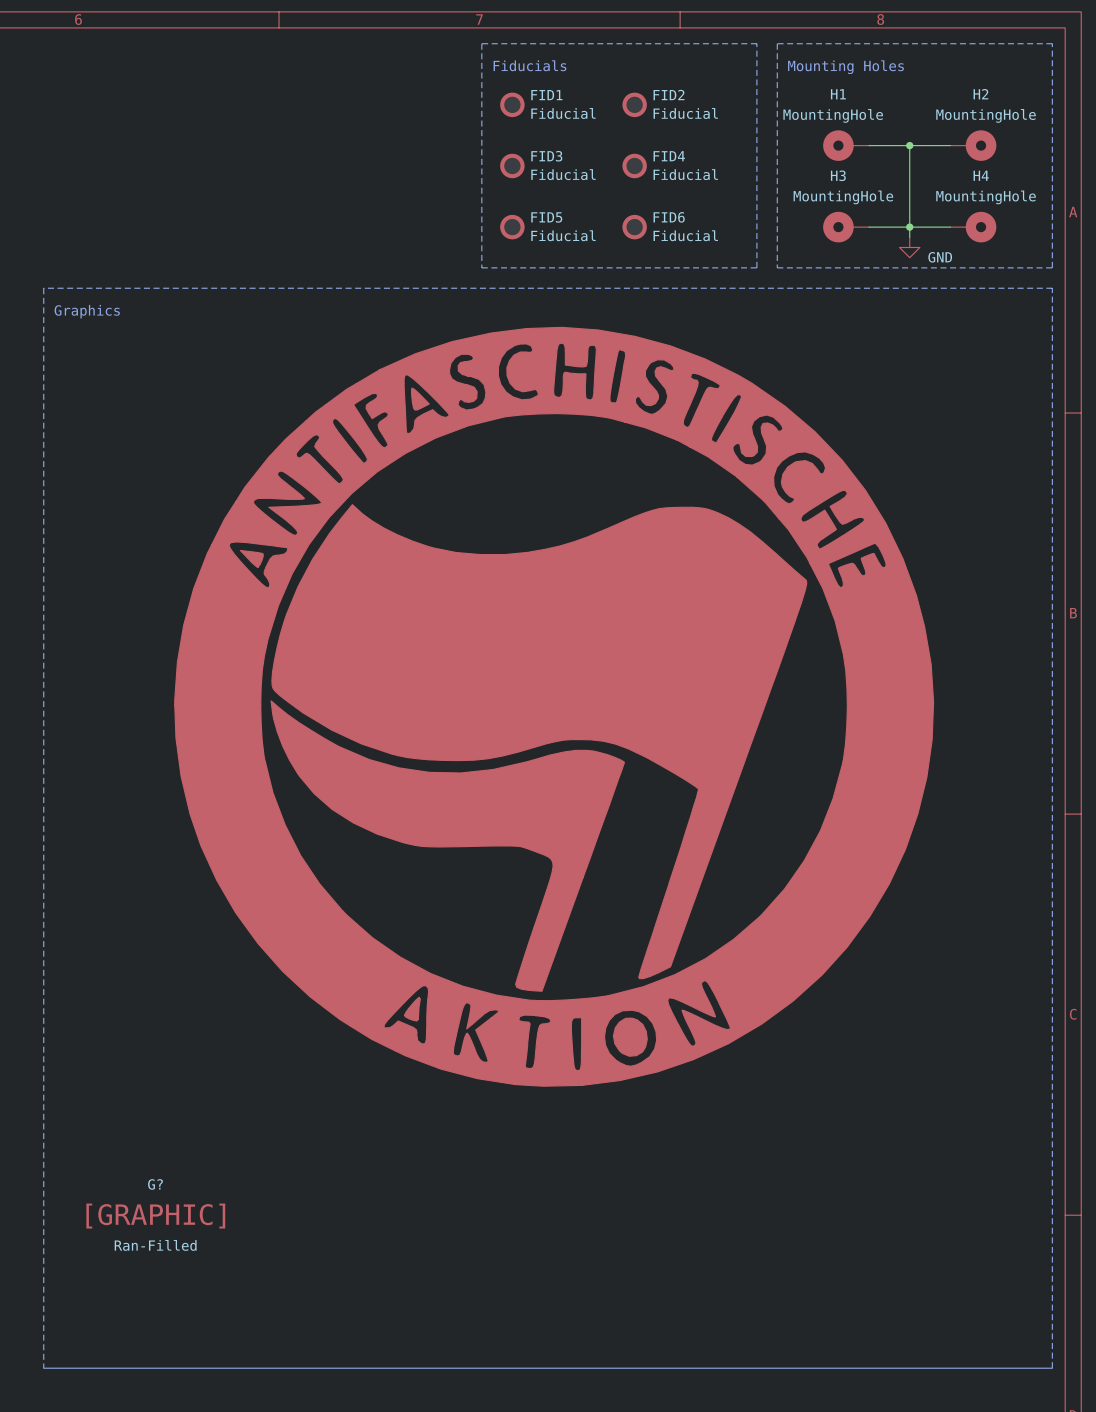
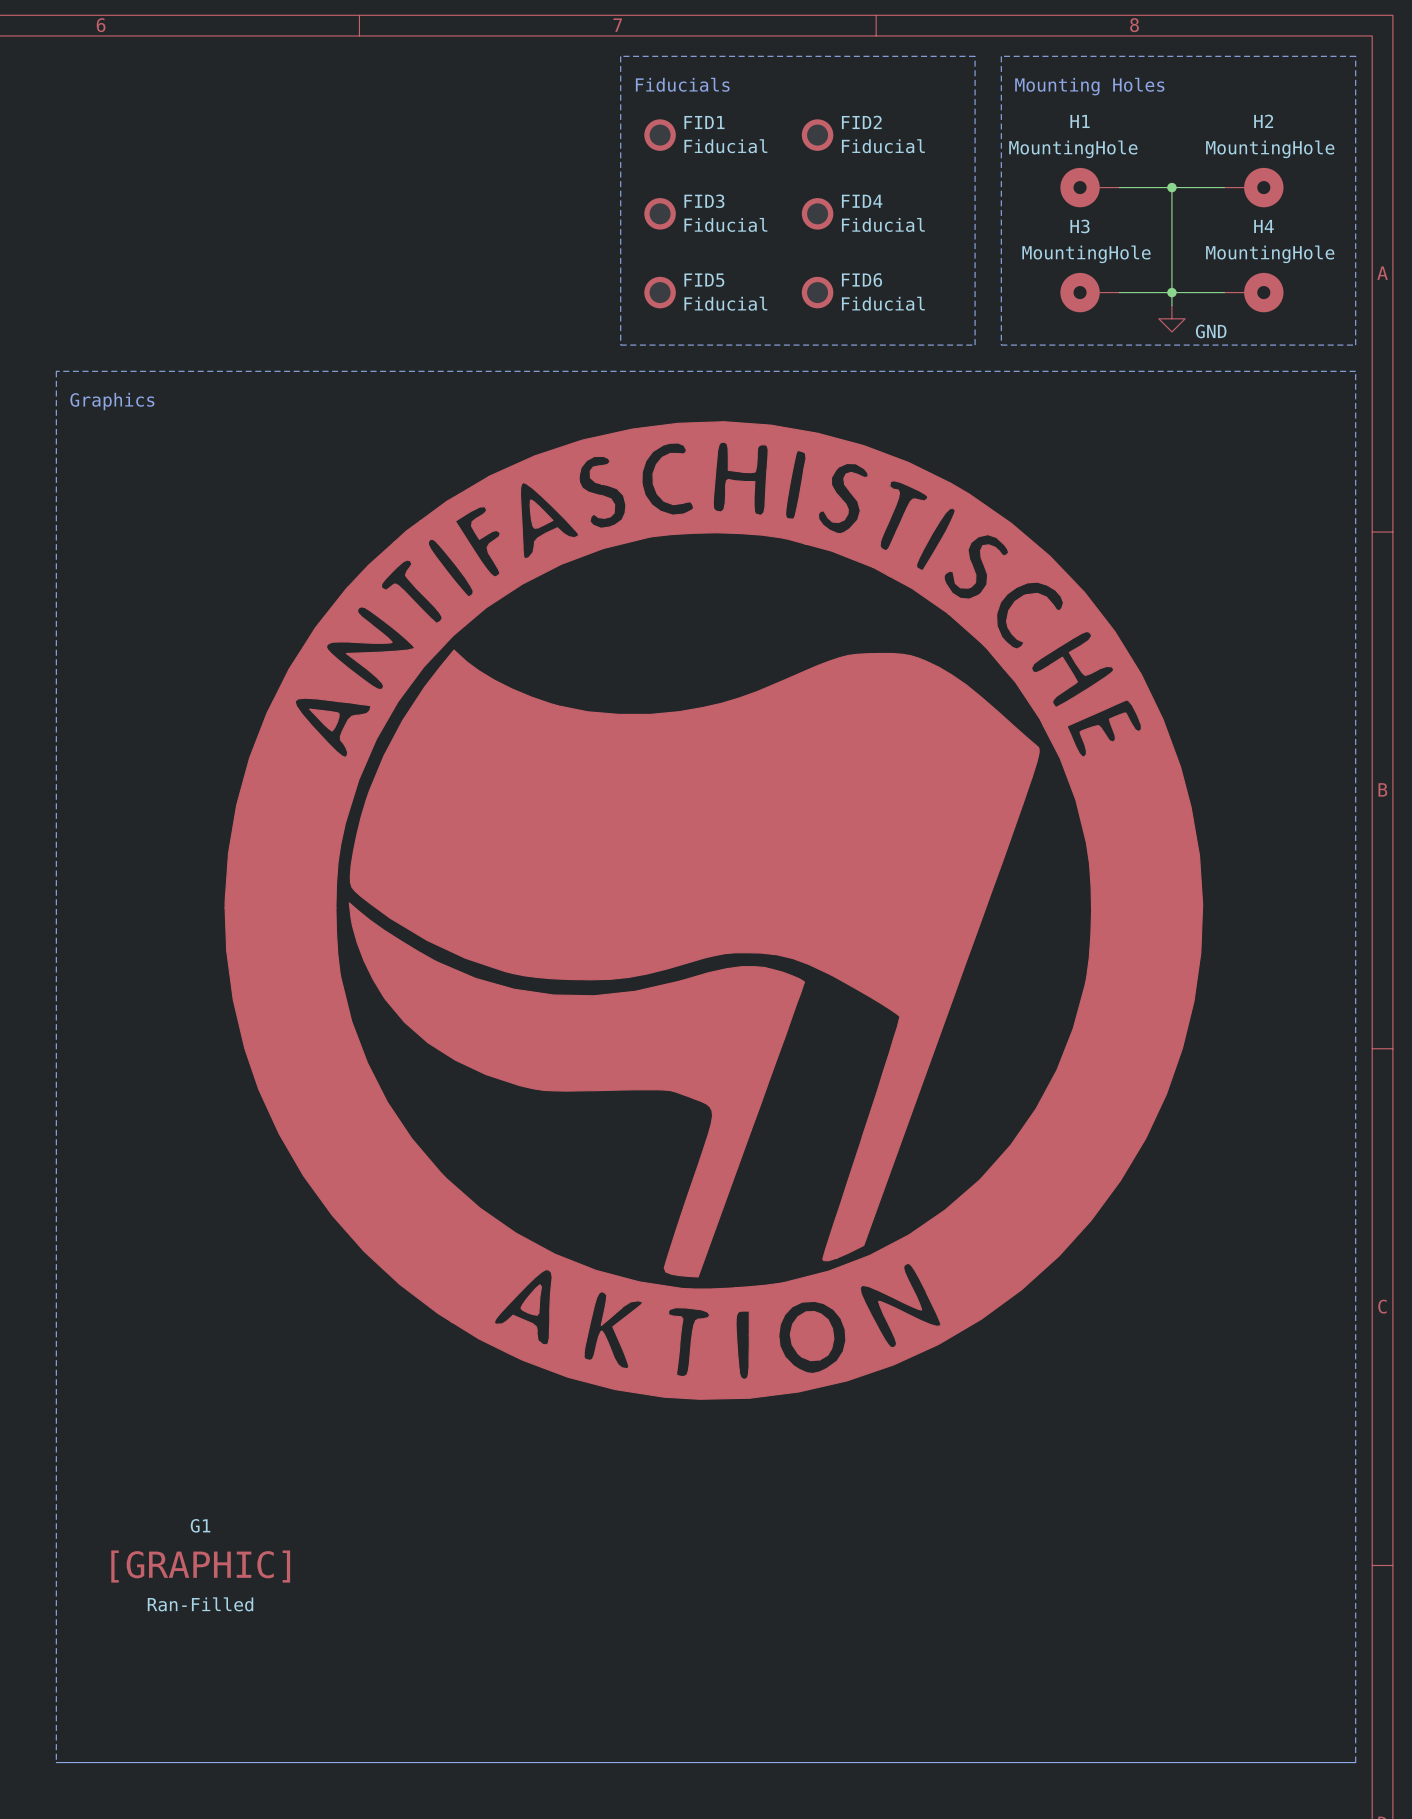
G? name: G? (155, 1184) -> G1 (200, 1525)

